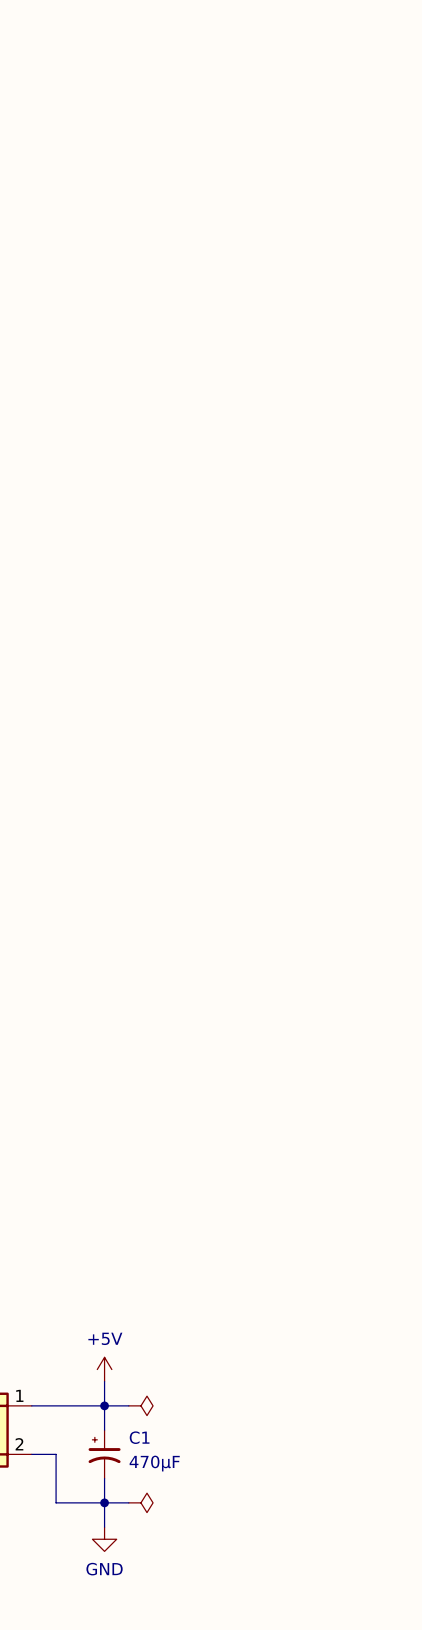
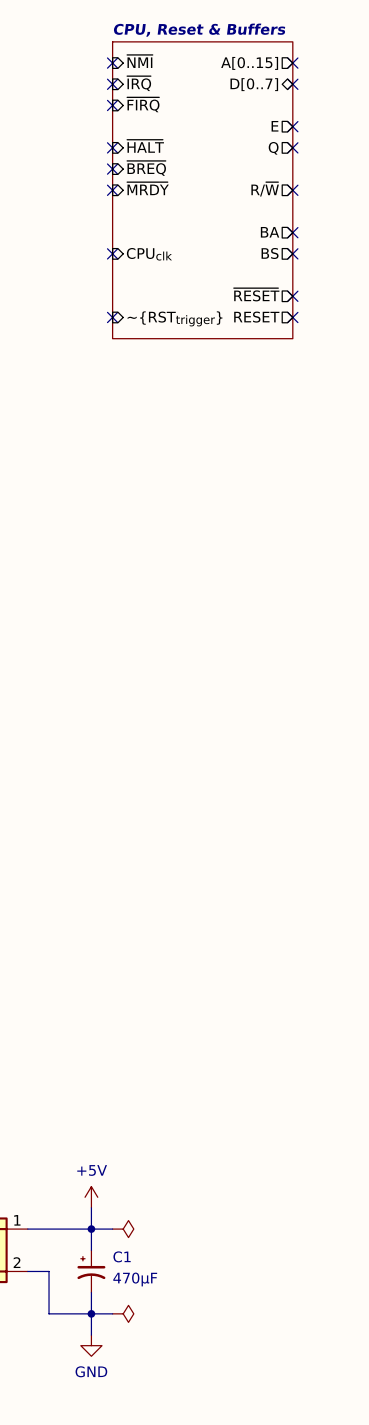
sheet pin: none -> ~{NMI} (139, 61)
no-connect mark: none -> (112, 63)
sheet pin: none -> A[0..15] (249, 63)
no-connect mark: none -> (292, 63)
sheet pin: none -> ~{IRQ} (139, 83)
no-connect mark: none -> (112, 84)
sheet pin: none -> D[0..7] (254, 84)
no-connect mark: none -> (292, 84)
sheet pin: none -> ~{FIRQ} (143, 104)
no-connect mark: none -> (112, 105)
sheet pin: none -> E (275, 126)
no-connect mark: none -> (292, 126)
sheet pin: none -> ~{HALT} (145, 146)
no-connect mark: none -> (112, 147)
sheet pin: none -> Q (273, 148)
no-connect mark: none -> (292, 147)
sheet pin: none -> ~{BREQ} (146, 168)
no-connect mark: none -> (112, 169)
sheet pin: none -> ~{MRDY} (147, 188)
sheet pin: none -> R/~{W} (265, 189)
no-connect mark: none -> (112, 190)
sheet CPU, Reset & Buffers: none -> (202, 190)
no-connect mark: none -> (292, 190)
sheet pin: none -> BA (270, 232)
no-connect mark: none -> (292, 232)
sheet pin: none -> BS (270, 253)
no-connect mark: none -> (112, 253)
sheet pin: none -> CPUclk (149, 254)
no-connect mark: none -> (292, 253)
sheet pin: none -> ~{RESET} (256, 294)
no-connect mark: none -> (292, 296)
sheet pin: none -> RESET (256, 317)
no-connect mark: none -> (112, 317)
no-connect mark: none -> (292, 317)
sheet pin: none -> ~{RSTtrigger} (175, 318)

